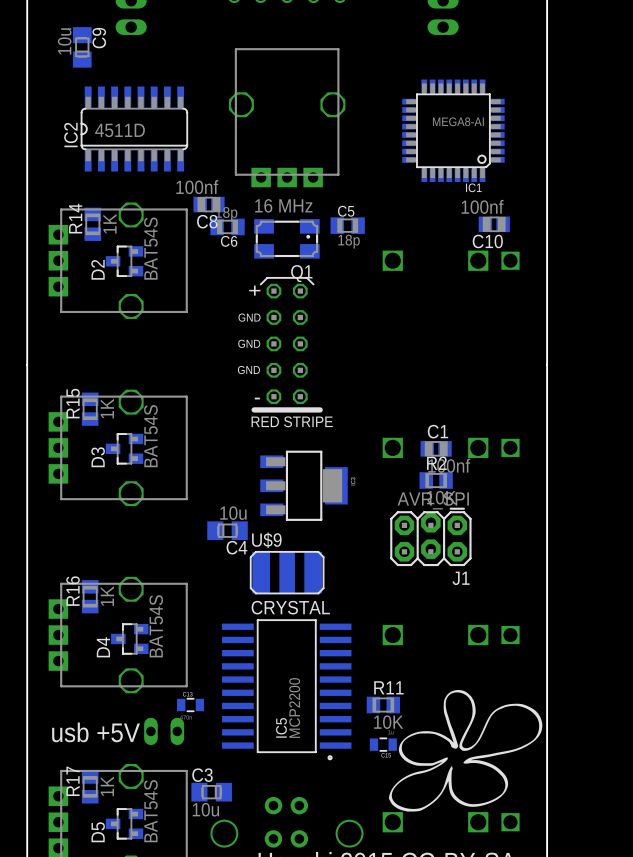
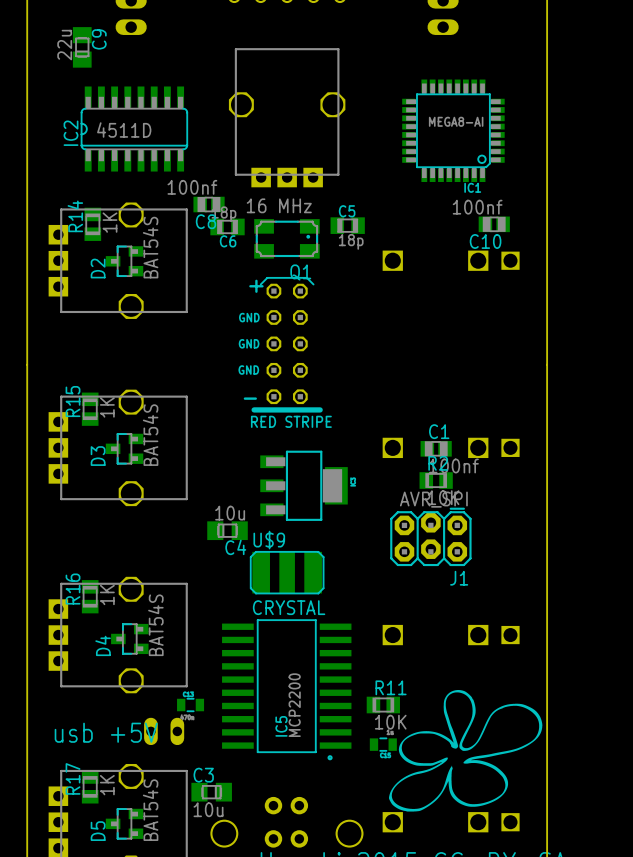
C9 value: 10u (64, 41) -> 22u (64, 45)

